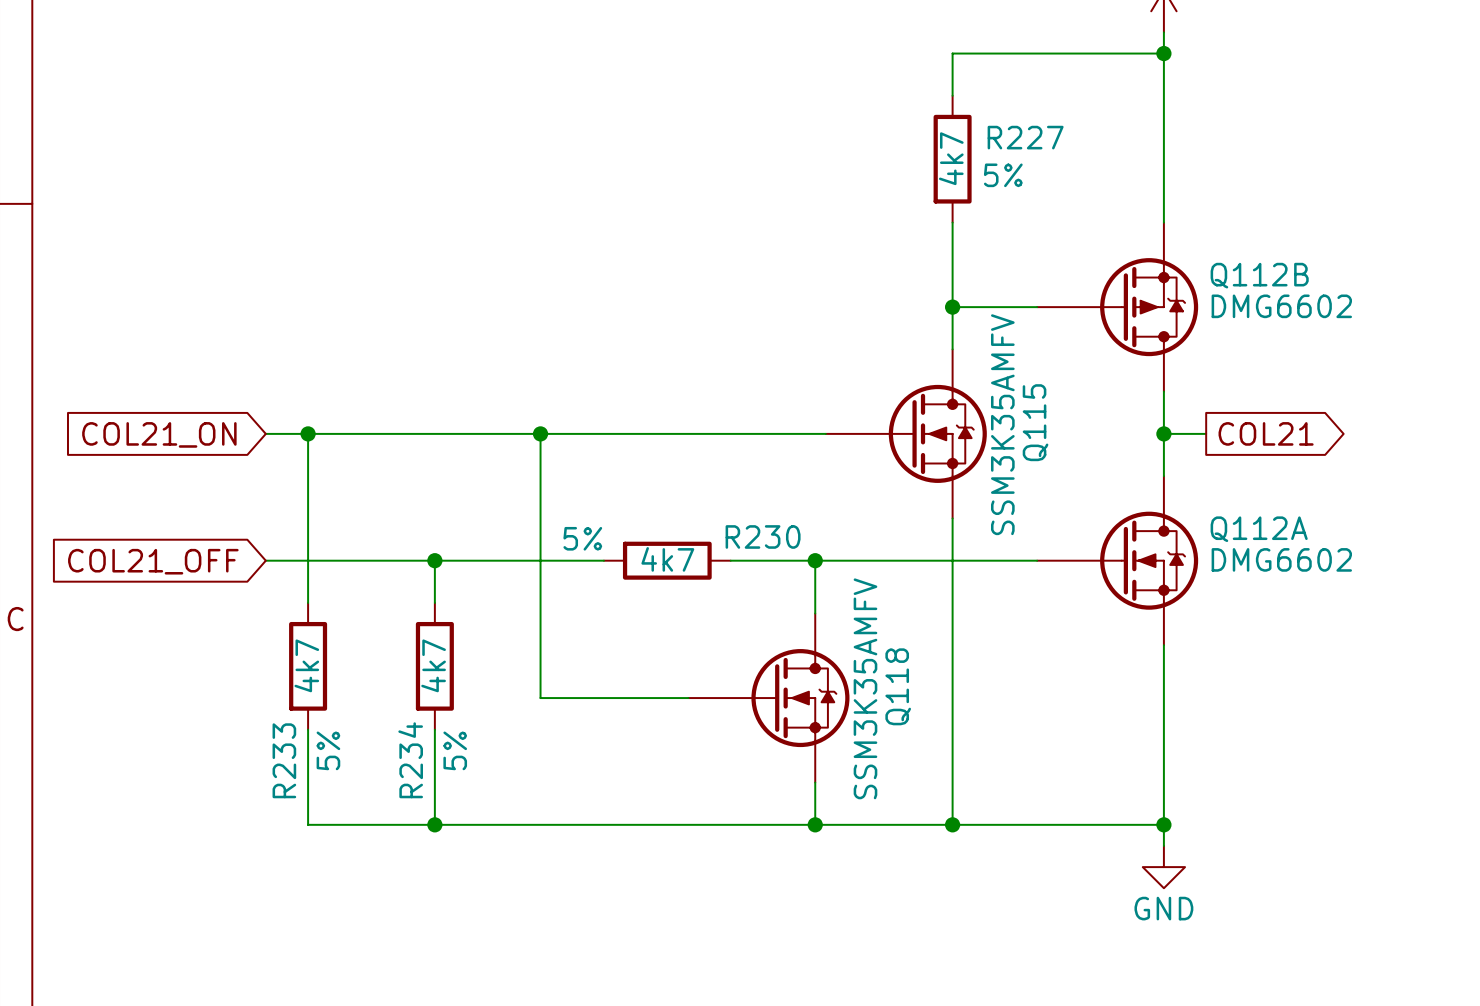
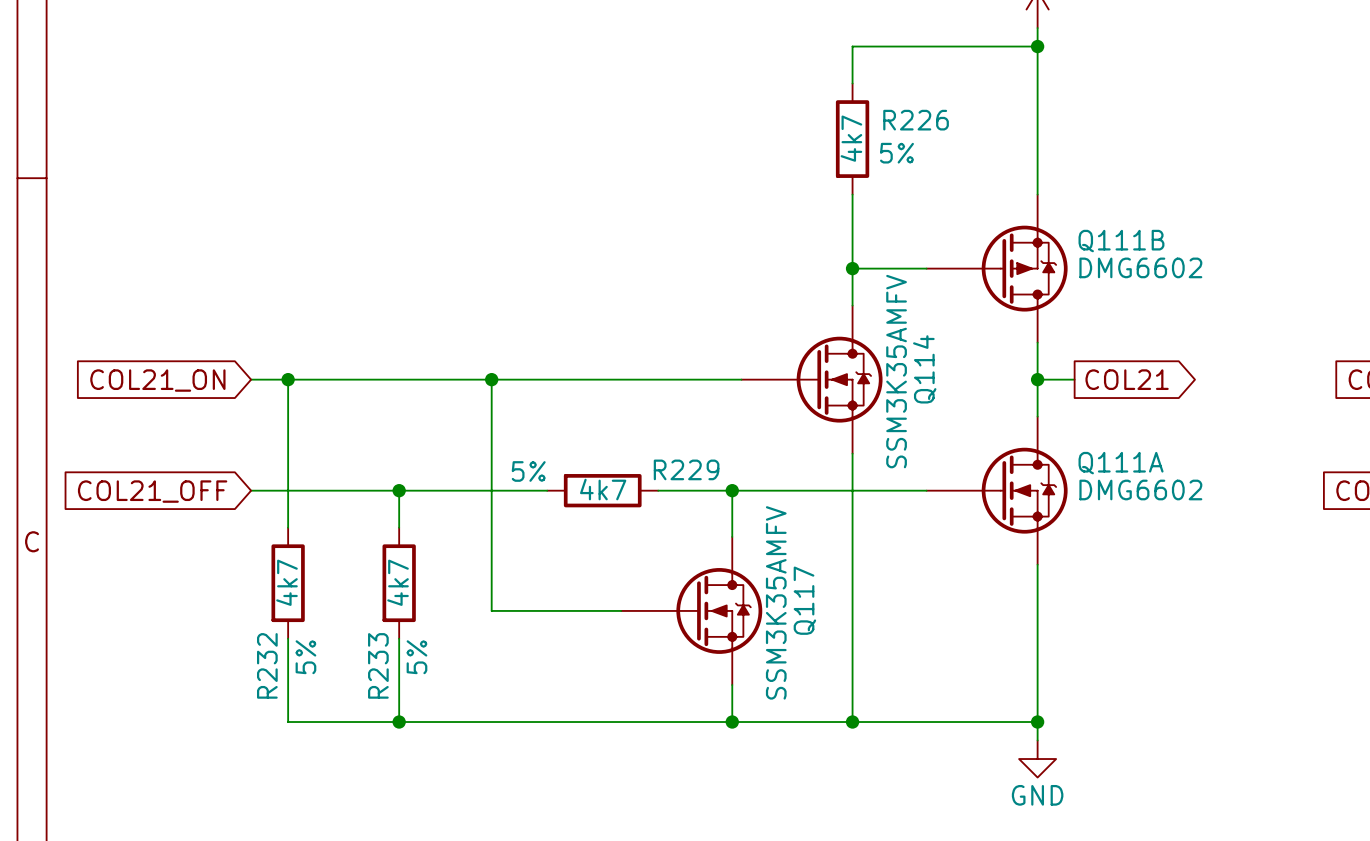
R227 name: R227 (1025, 137) -> R226 (916, 120)
Q112B name: Q112B (1259, 275) -> Q111B (1121, 241)
Q115 name: Q115 (1035, 422) -> Q114 (924, 369)
Q112A name: Q112A (1259, 529) -> Q111A (1121, 463)
R230 name: R230 (763, 536) -> R229 (686, 469)
Q118 name: Q118 (898, 686) -> Q117 (804, 600)
R233 name: R233 (284, 760) -> R232 (267, 665)
R234 name: R234 (410, 760) -> R233 (378, 665)

